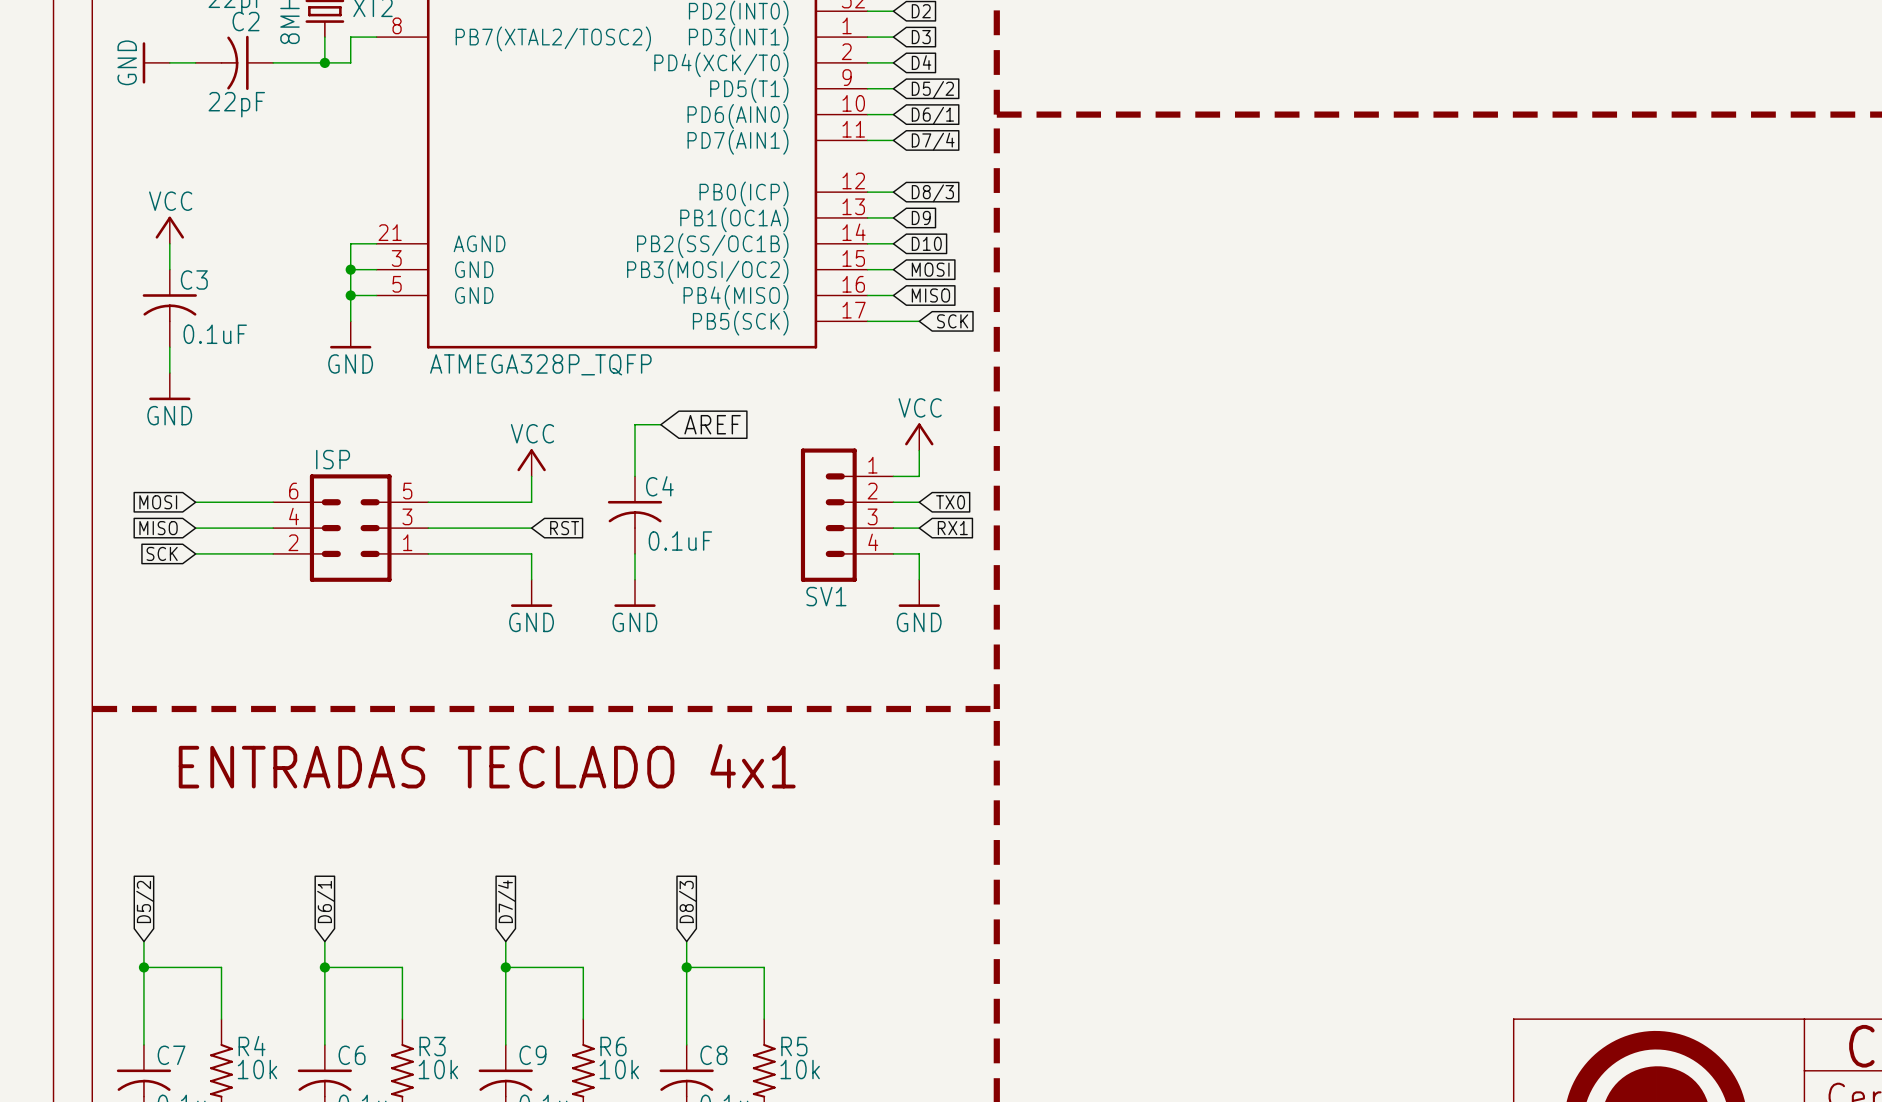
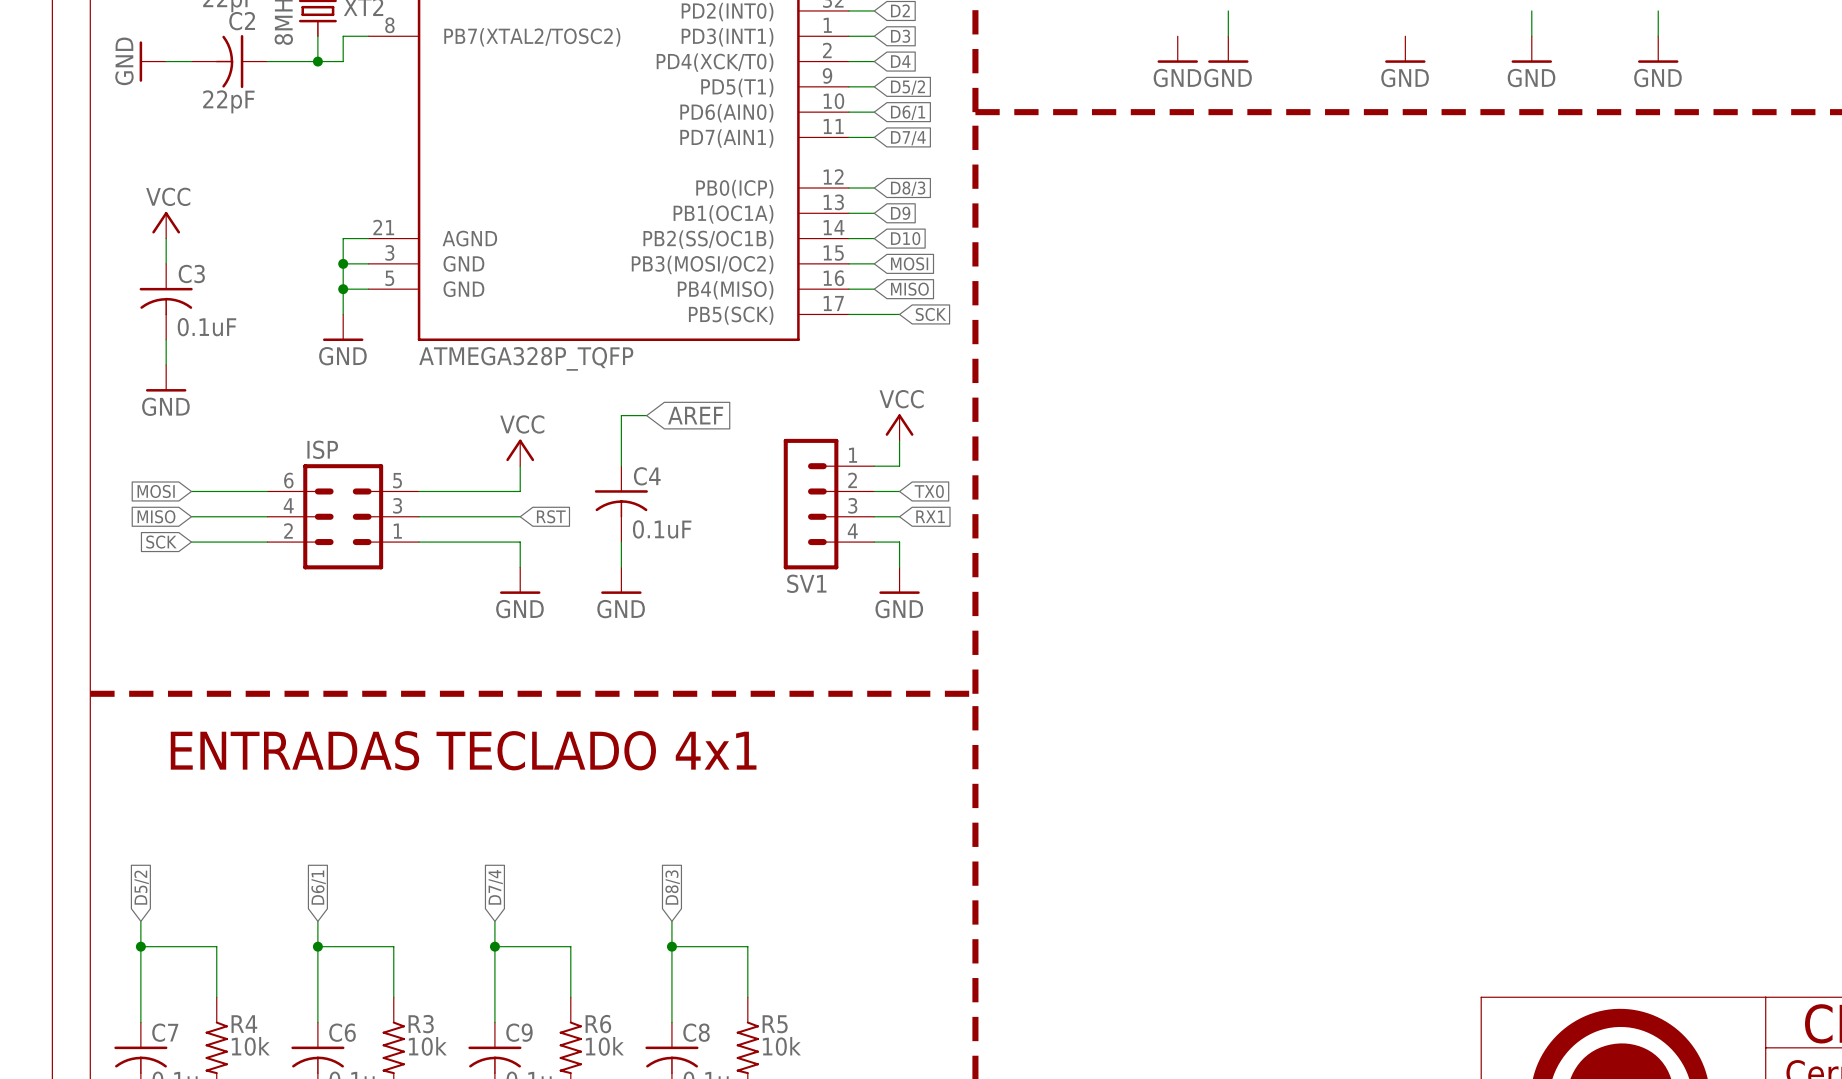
wire: none -> (1228, 10) (1228, 36)
wire: none -> (1531, 10) (1531, 36)
wire: none -> (1658, 10) (1658, 36)
power symbol: none -> GND (1177, 49)
power symbol: none -> GND (1228, 49)
power symbol: none -> GND (1405, 49)
power symbol: none -> GND (1531, 49)
power symbol: none -> GND (1658, 49)

